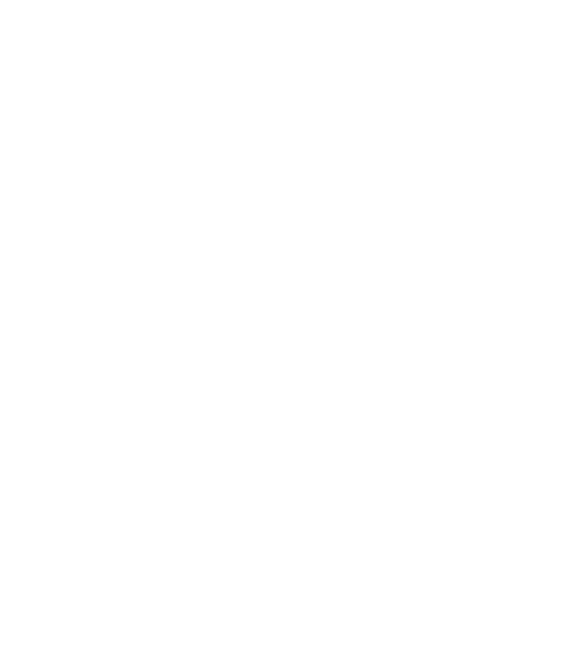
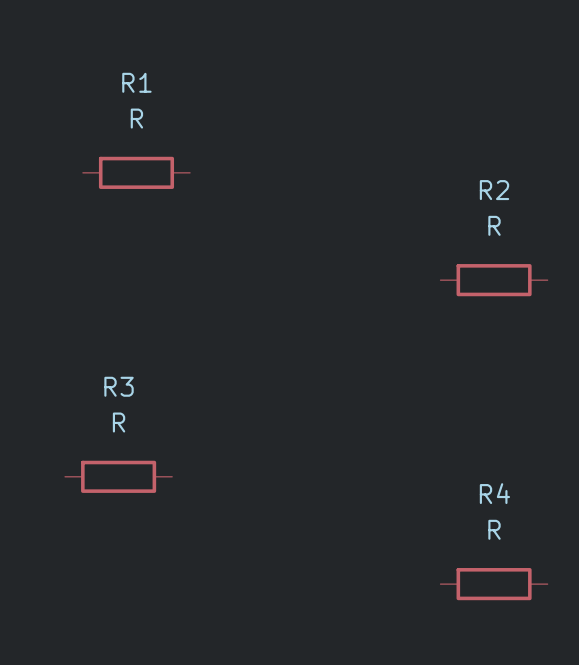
R1: none -> R (136, 172)
R2: none -> R (494, 280)
R3: none -> R (118, 476)
R4: none -> R (494, 584)

